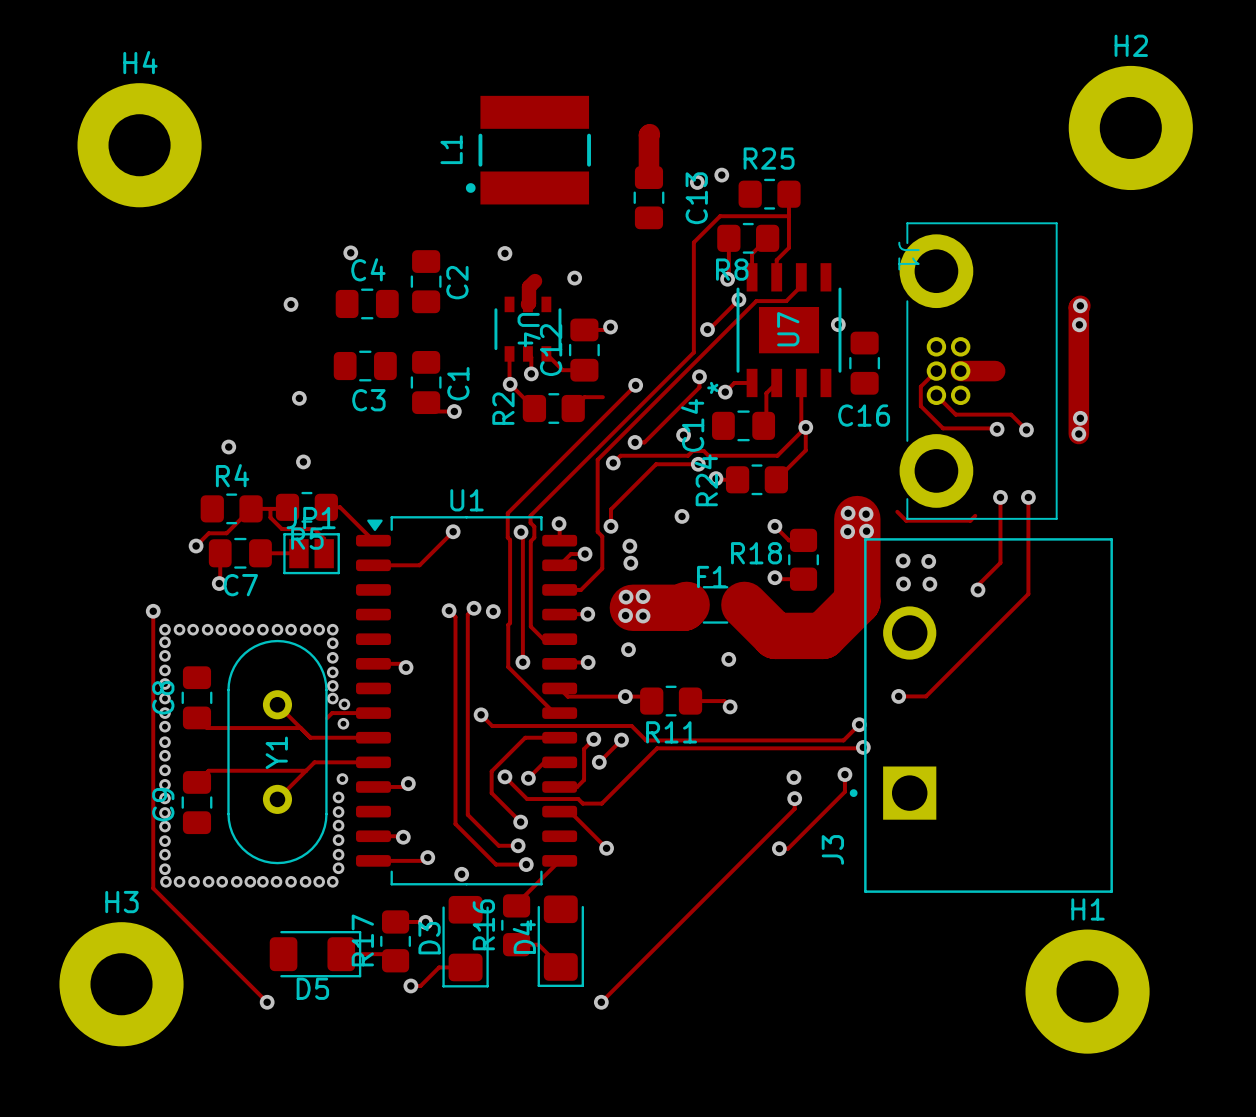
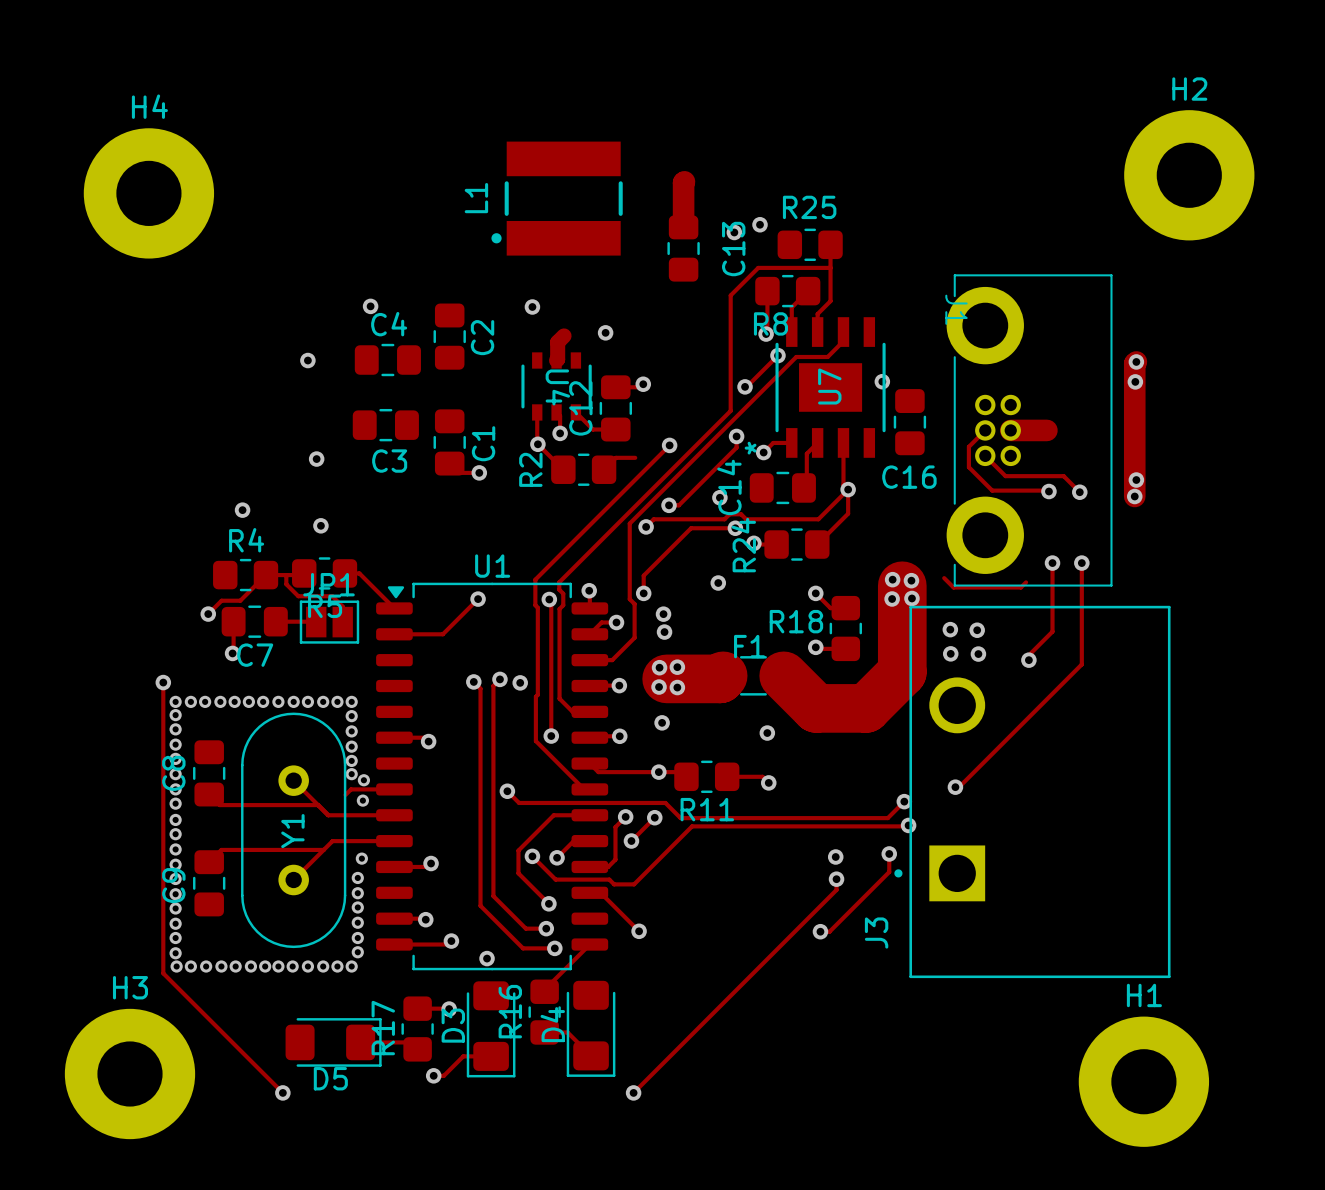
track: (898, 696) (926, 696) -> (955, 787) (959, 787) (974, 771)
via position: (898, 696) -> (955, 787)

